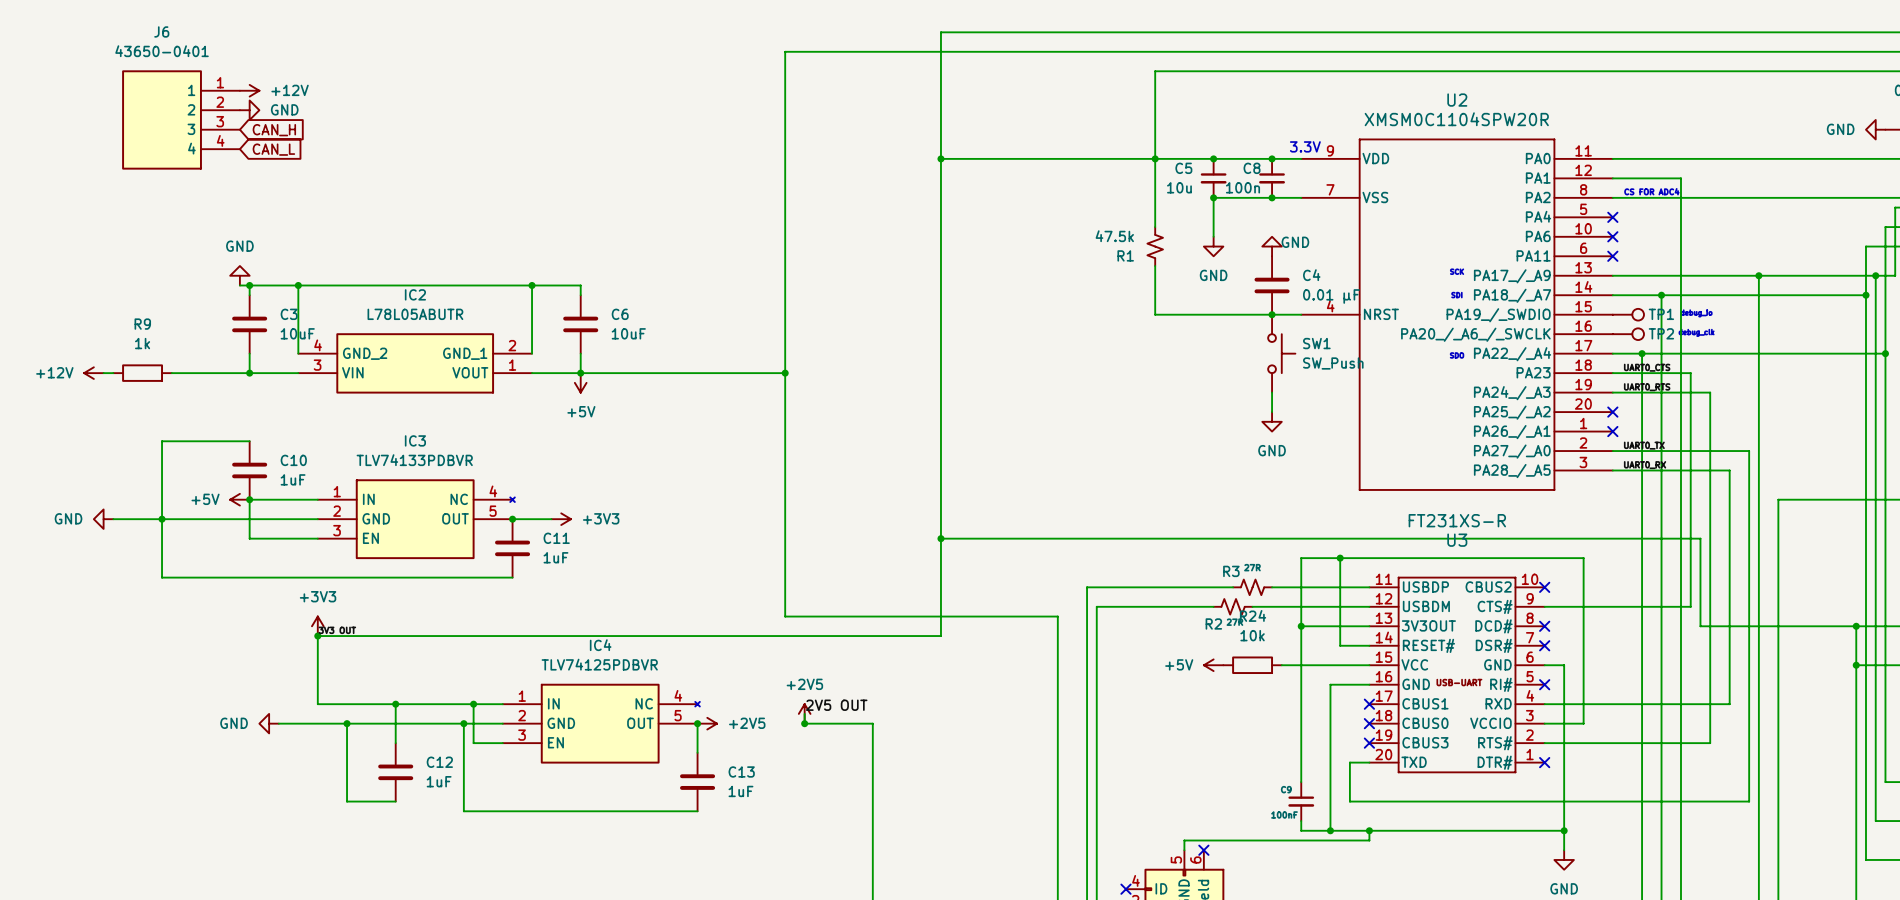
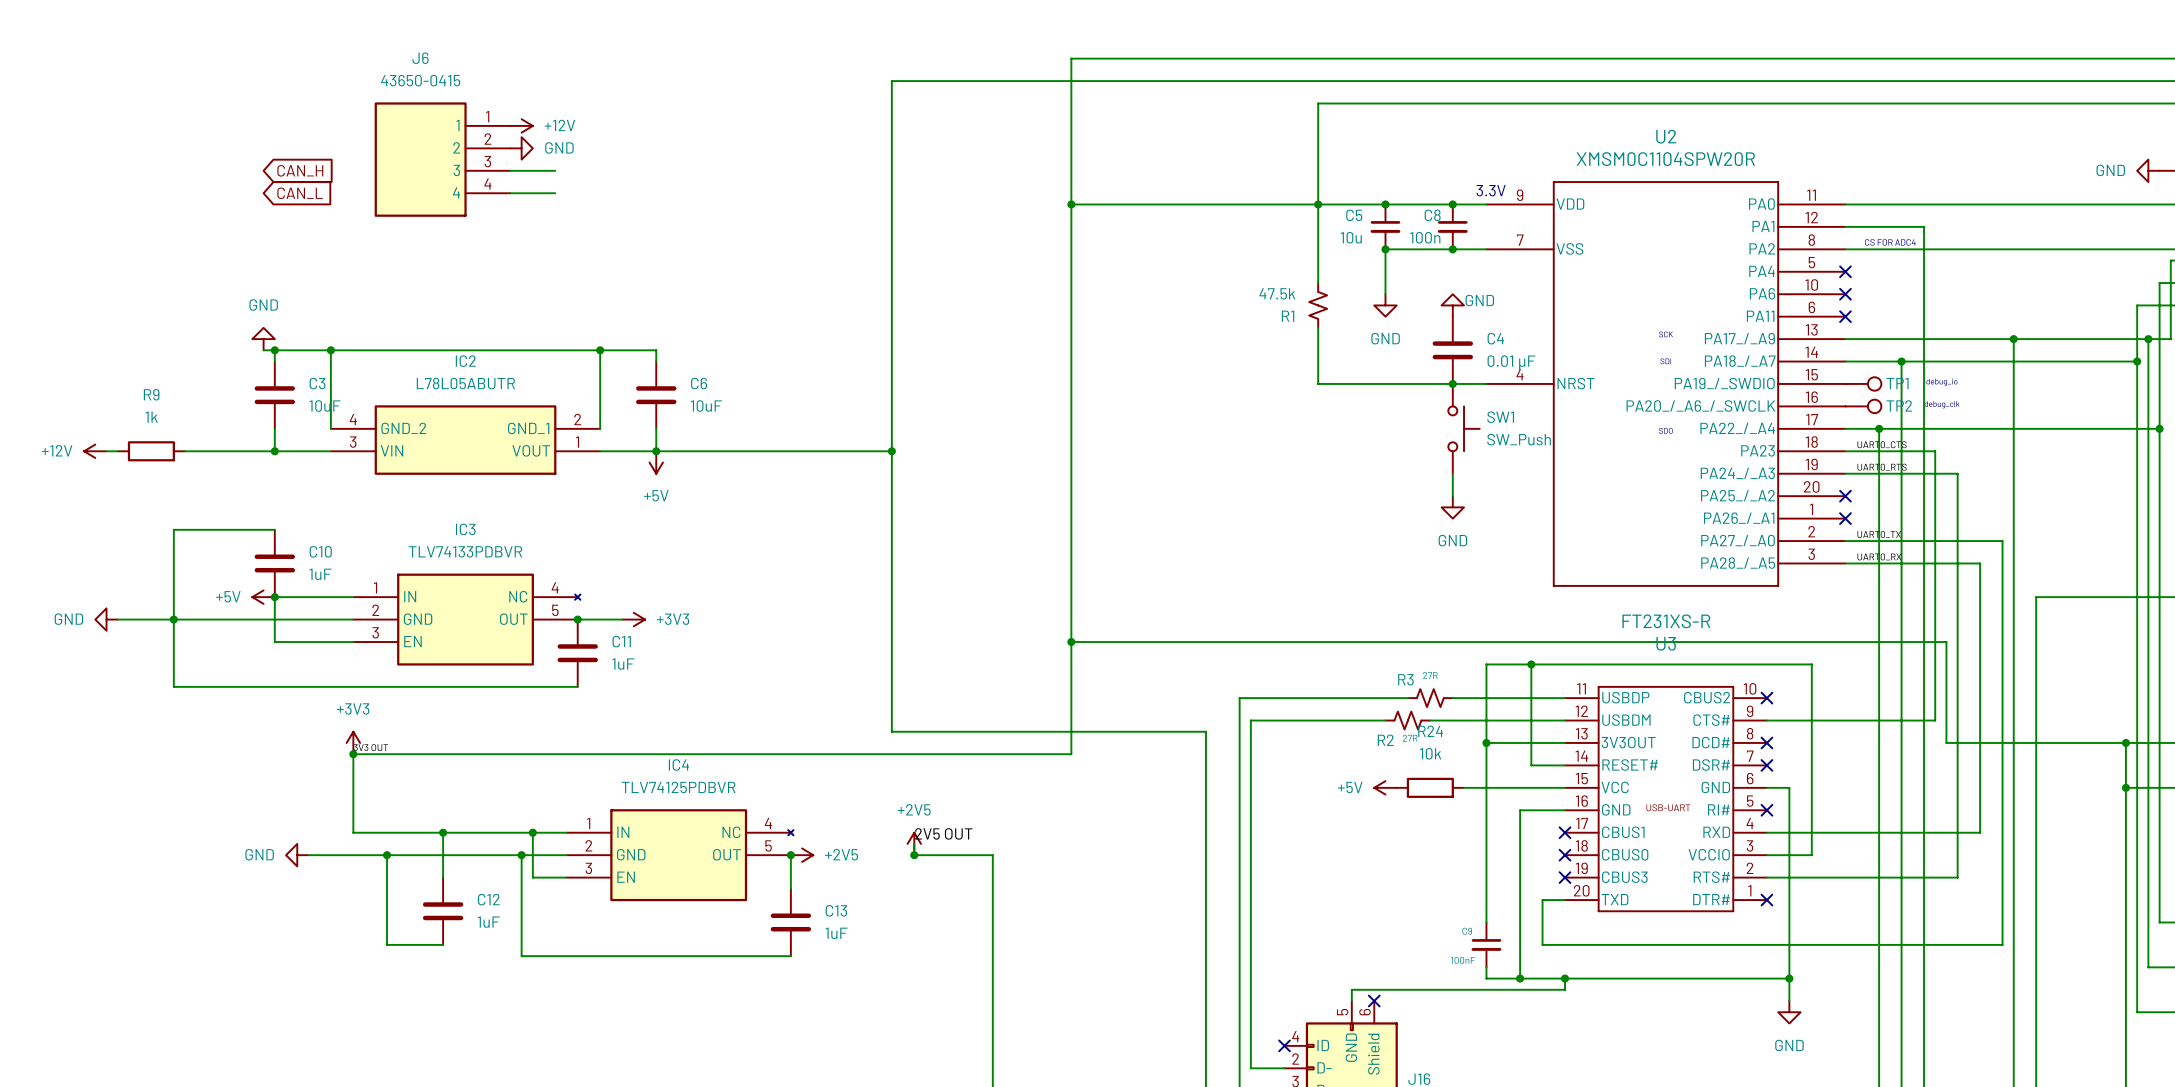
J6 value: 43650-0401 (162, 51) -> 43650-0415 (420, 80)
power symbol: +12V (249, 90) -> none
power symbol: none -> +12V (521, 125)
power symbol: GND (249, 110) -> none
power symbol: none -> GND (521, 148)
J6 position: (181, 119) -> (442, 159)
wire: none -> (510, 170) (555, 170)
wire: none -> (510, 193) (555, 193)

